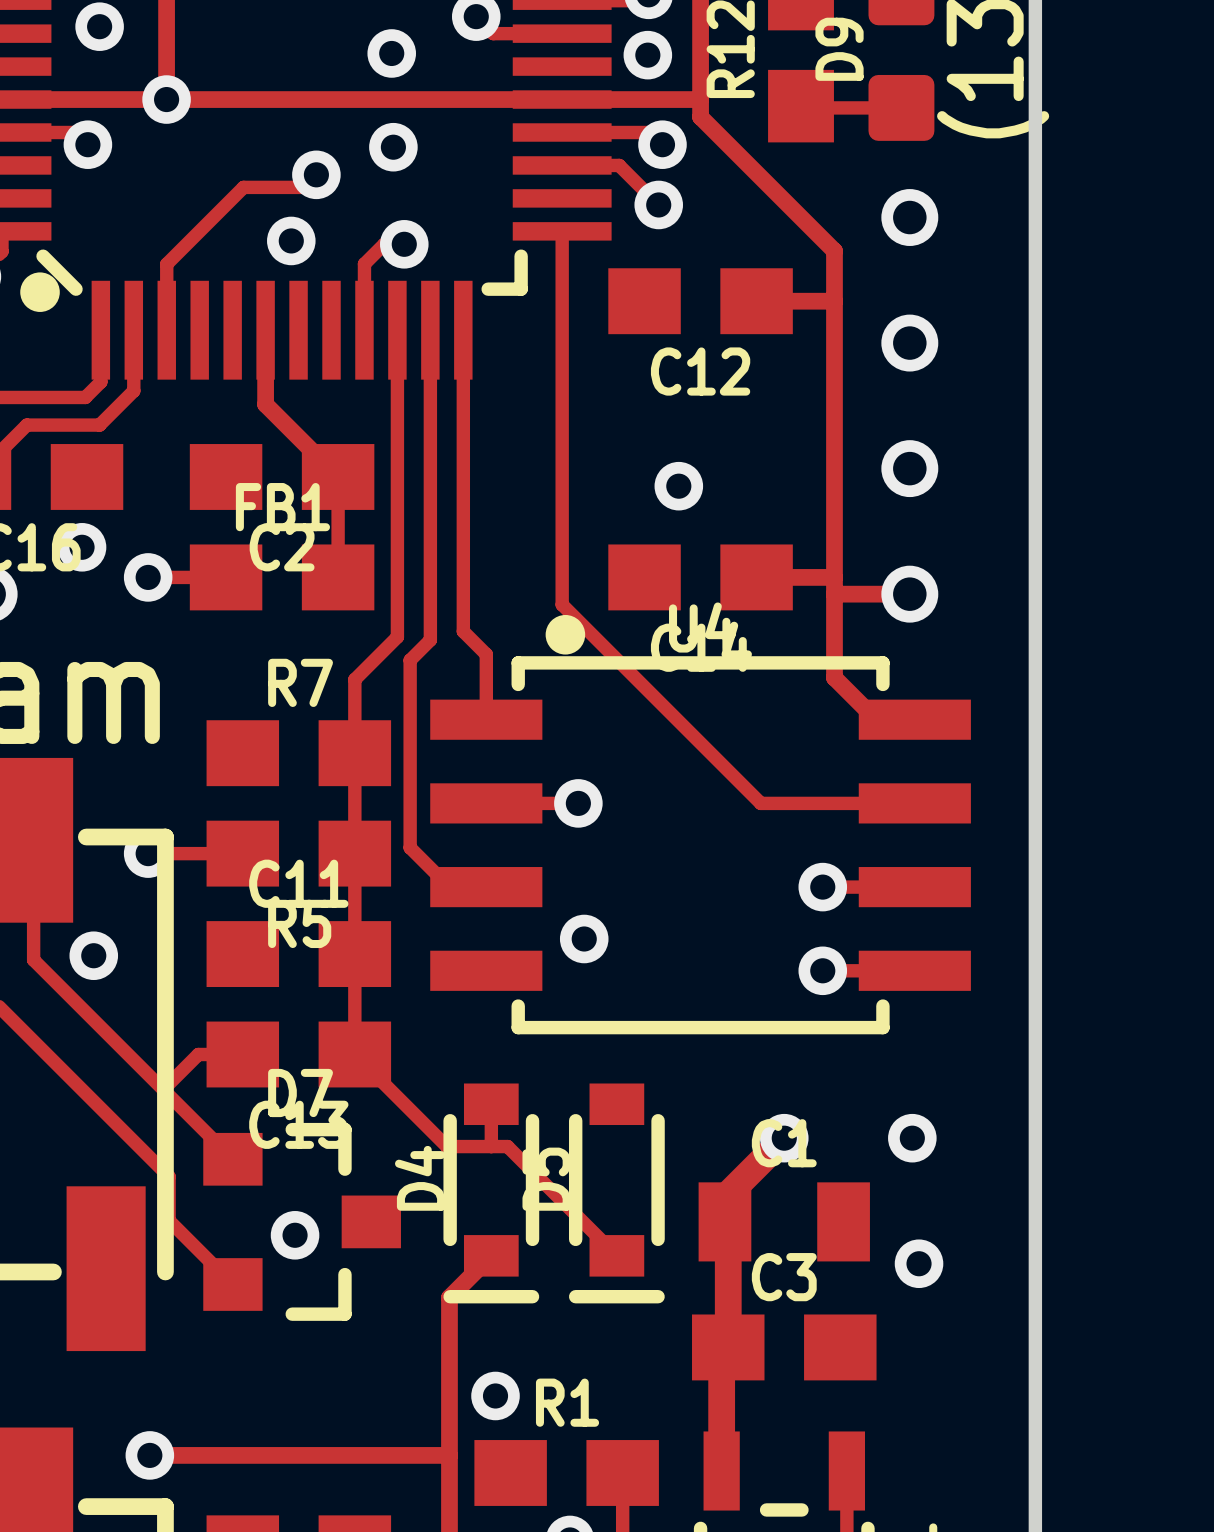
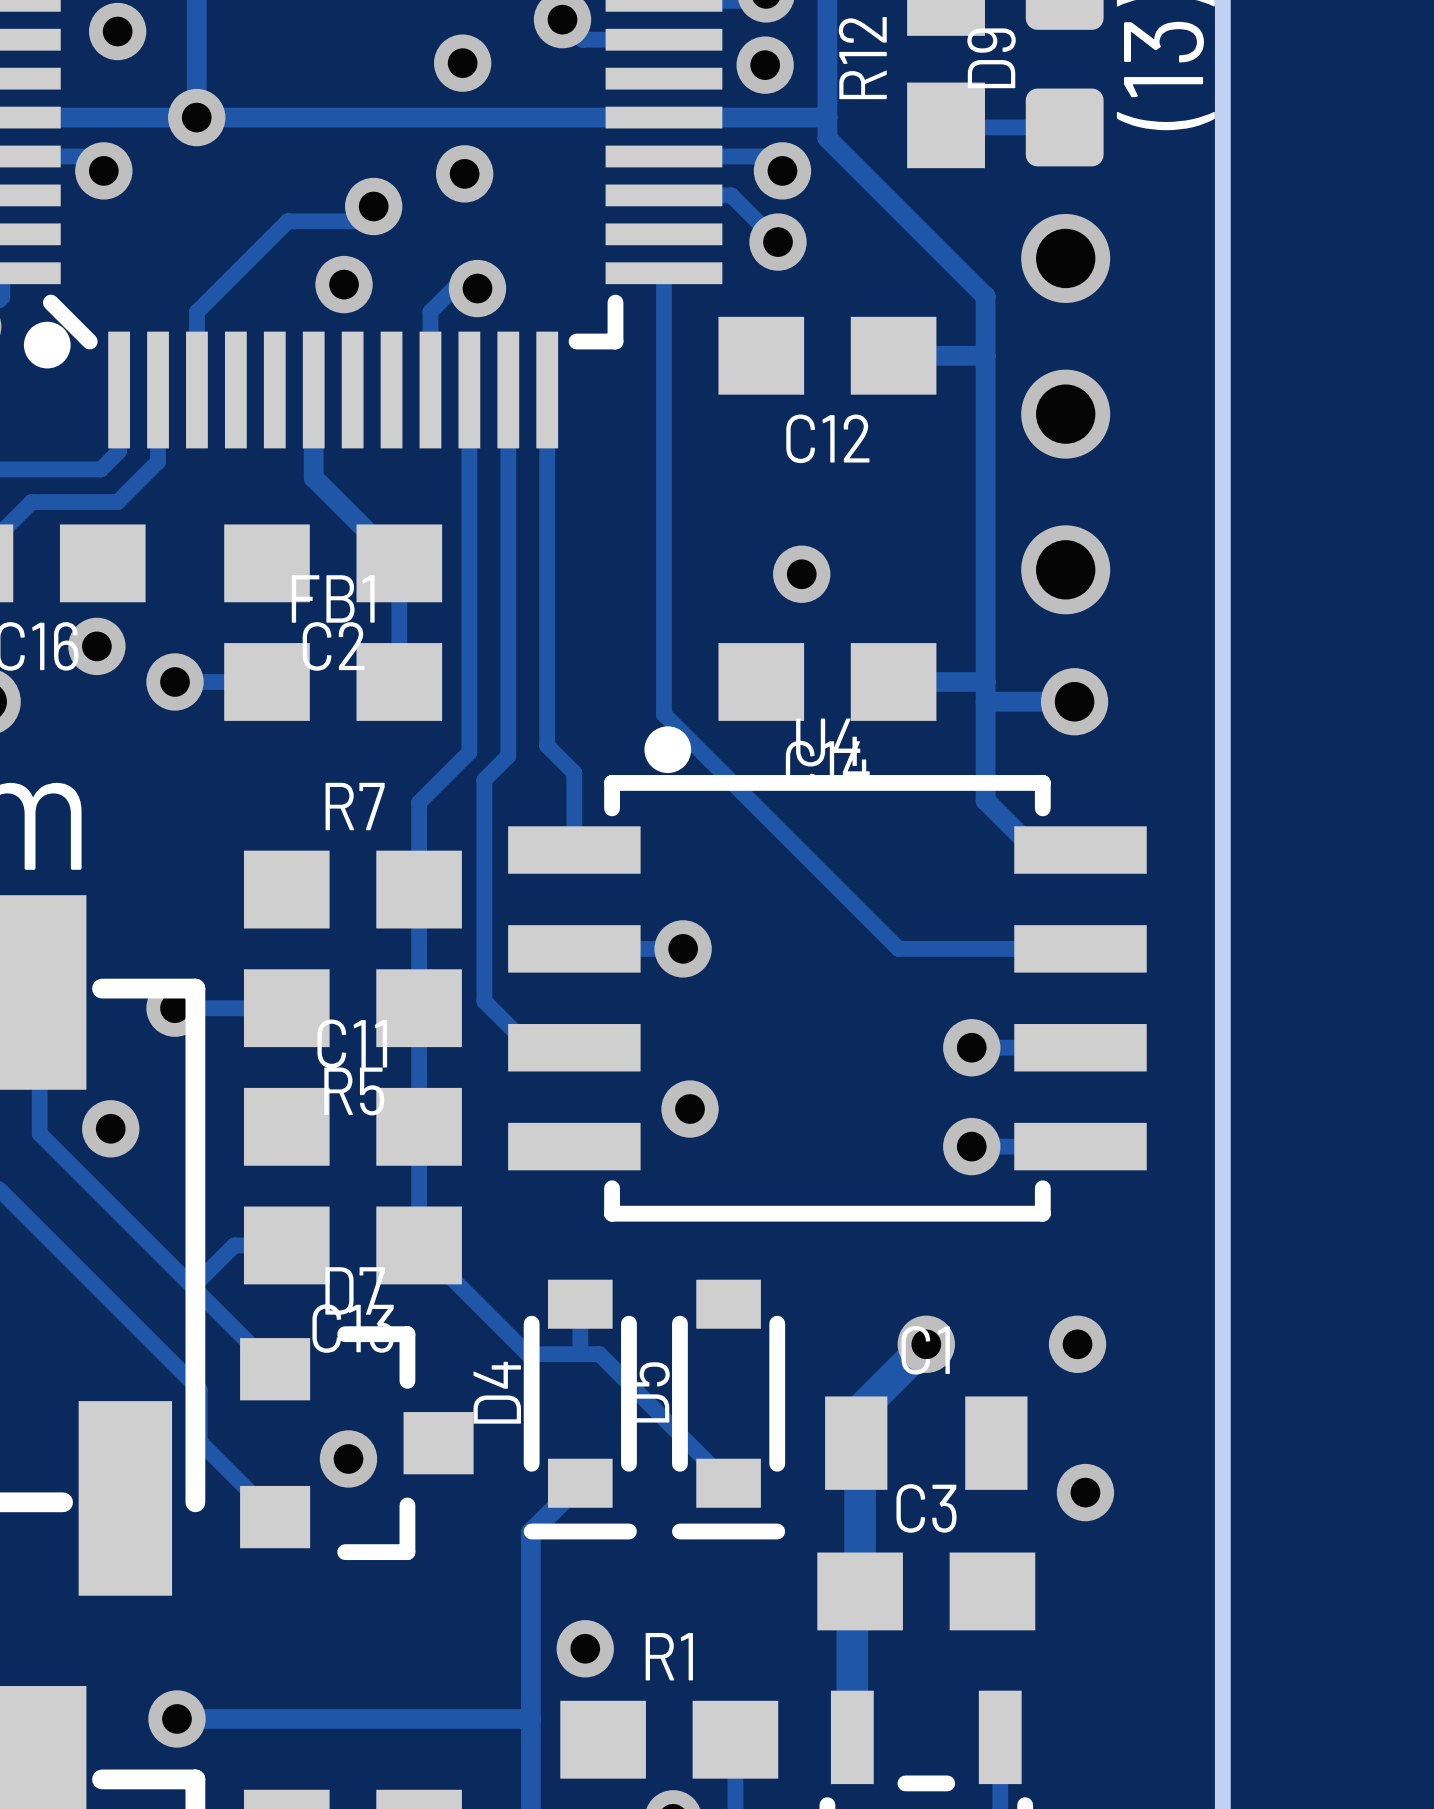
via size: [881, 189, 939, 246] -> [1021, 213, 1111, 303]
via size: [881, 314, 939, 372] -> [1021, 369, 1111, 459]
via size: [881, 440, 939, 498] -> [1021, 525, 1111, 615]

